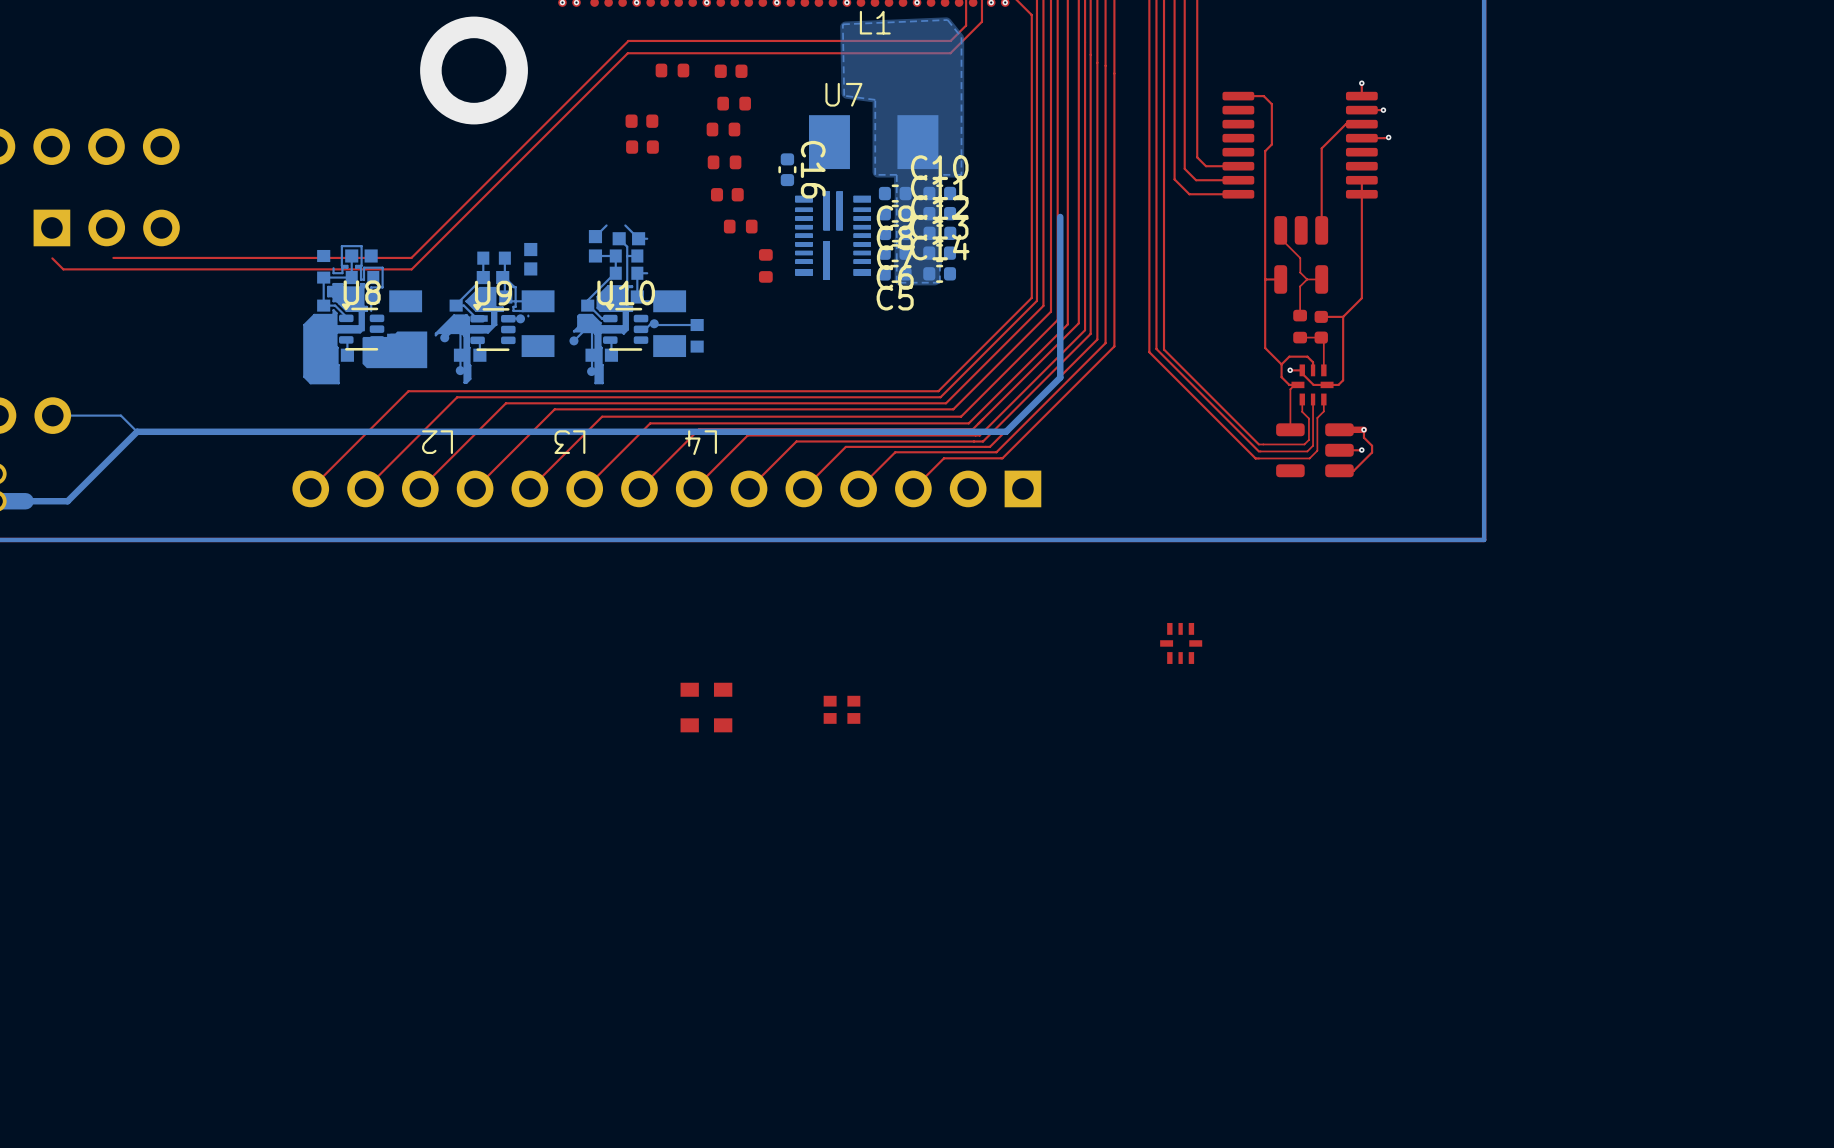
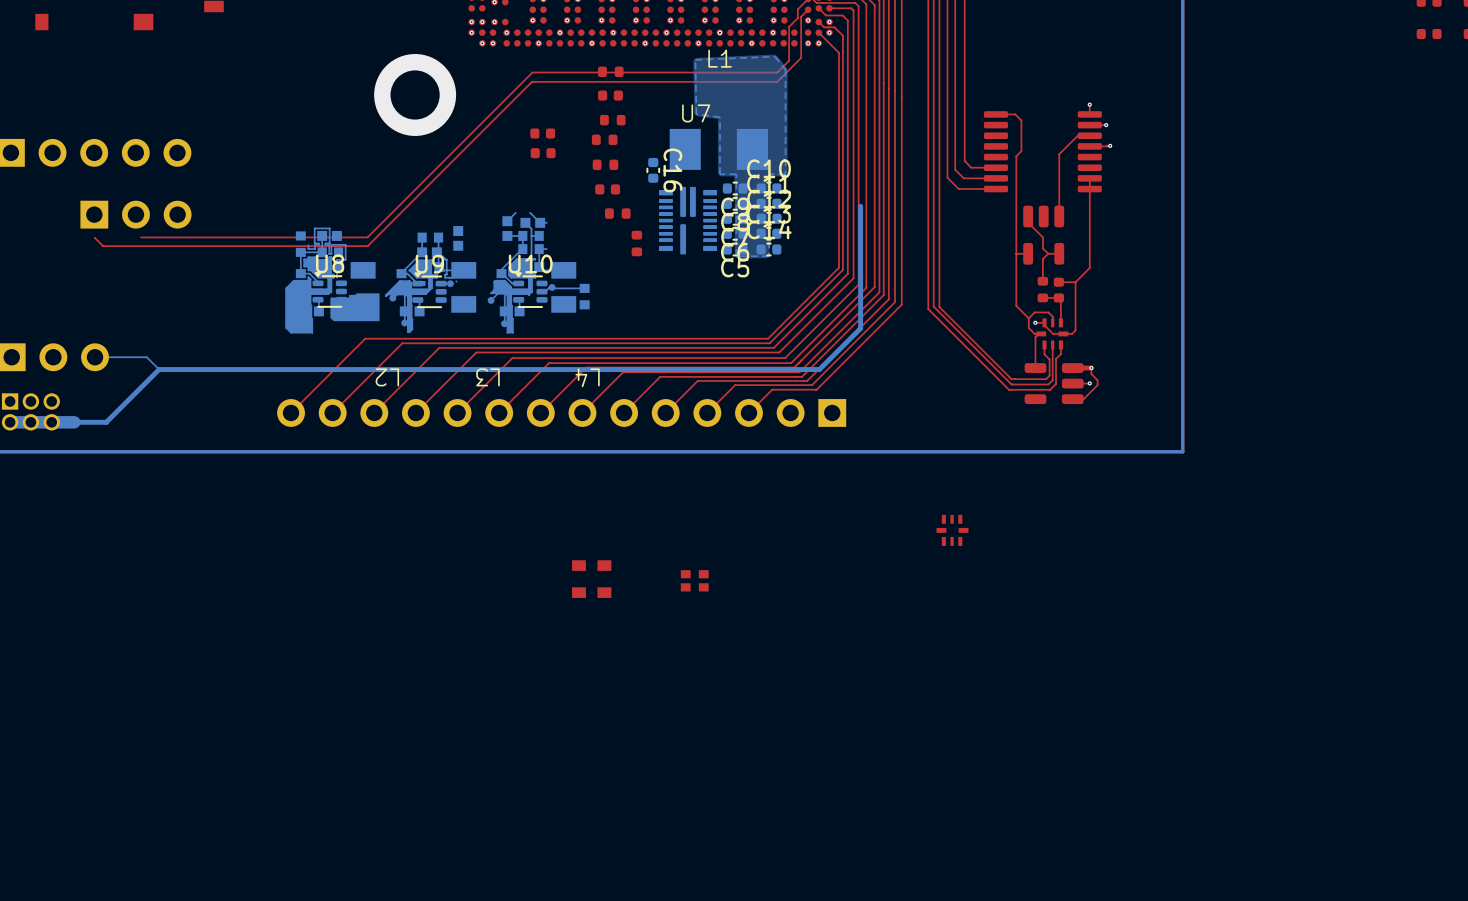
part position: (672, 70) -> (610, 71)

